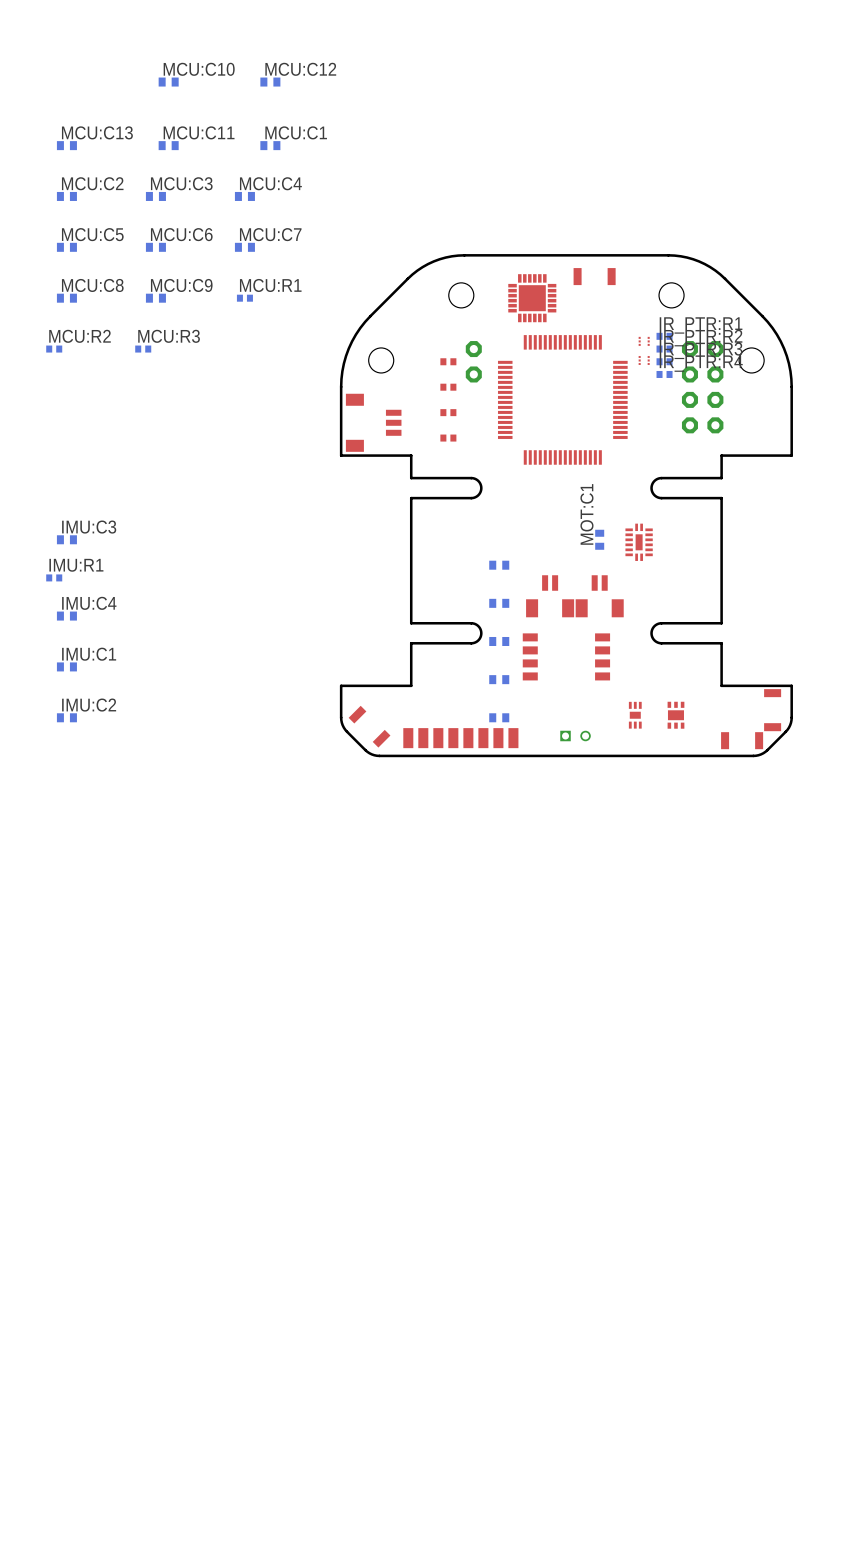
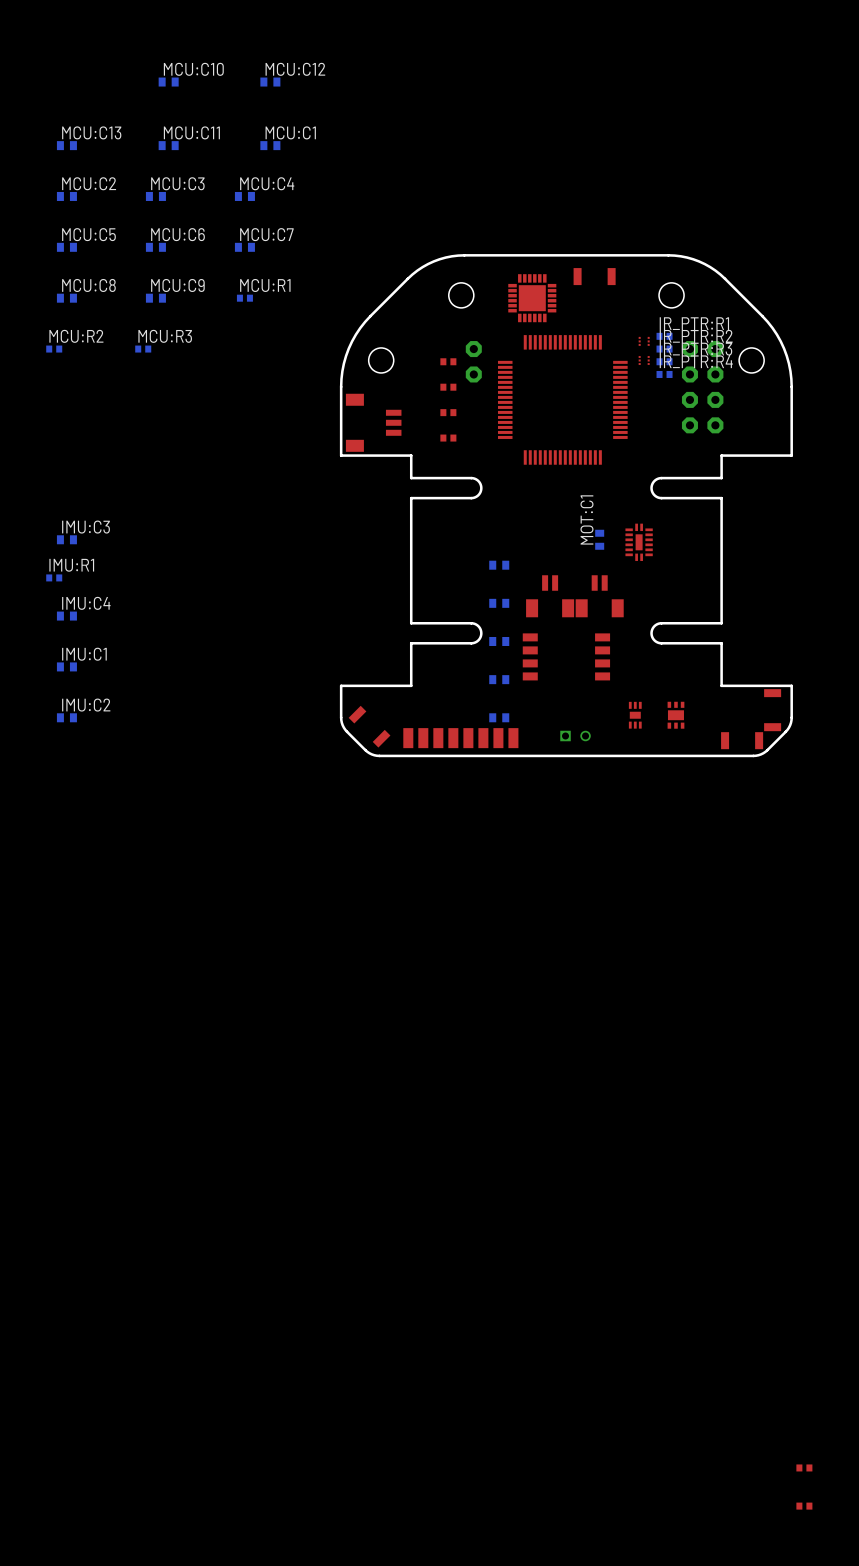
part: none -> (804, 1467)
part: none -> (804, 1506)

